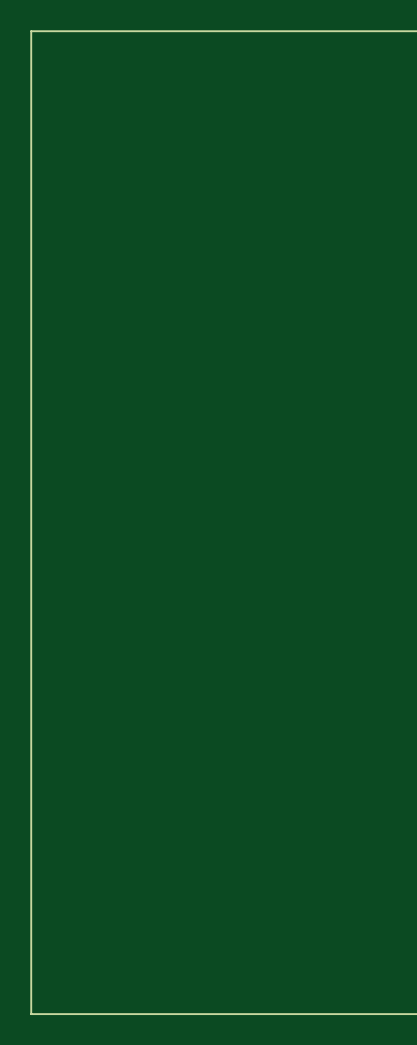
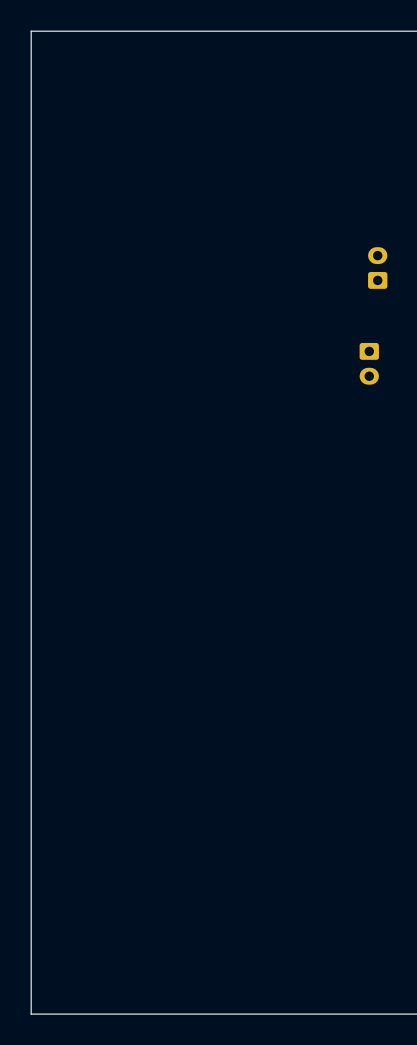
part: none -> (377, 268)
part: none -> (369, 363)

